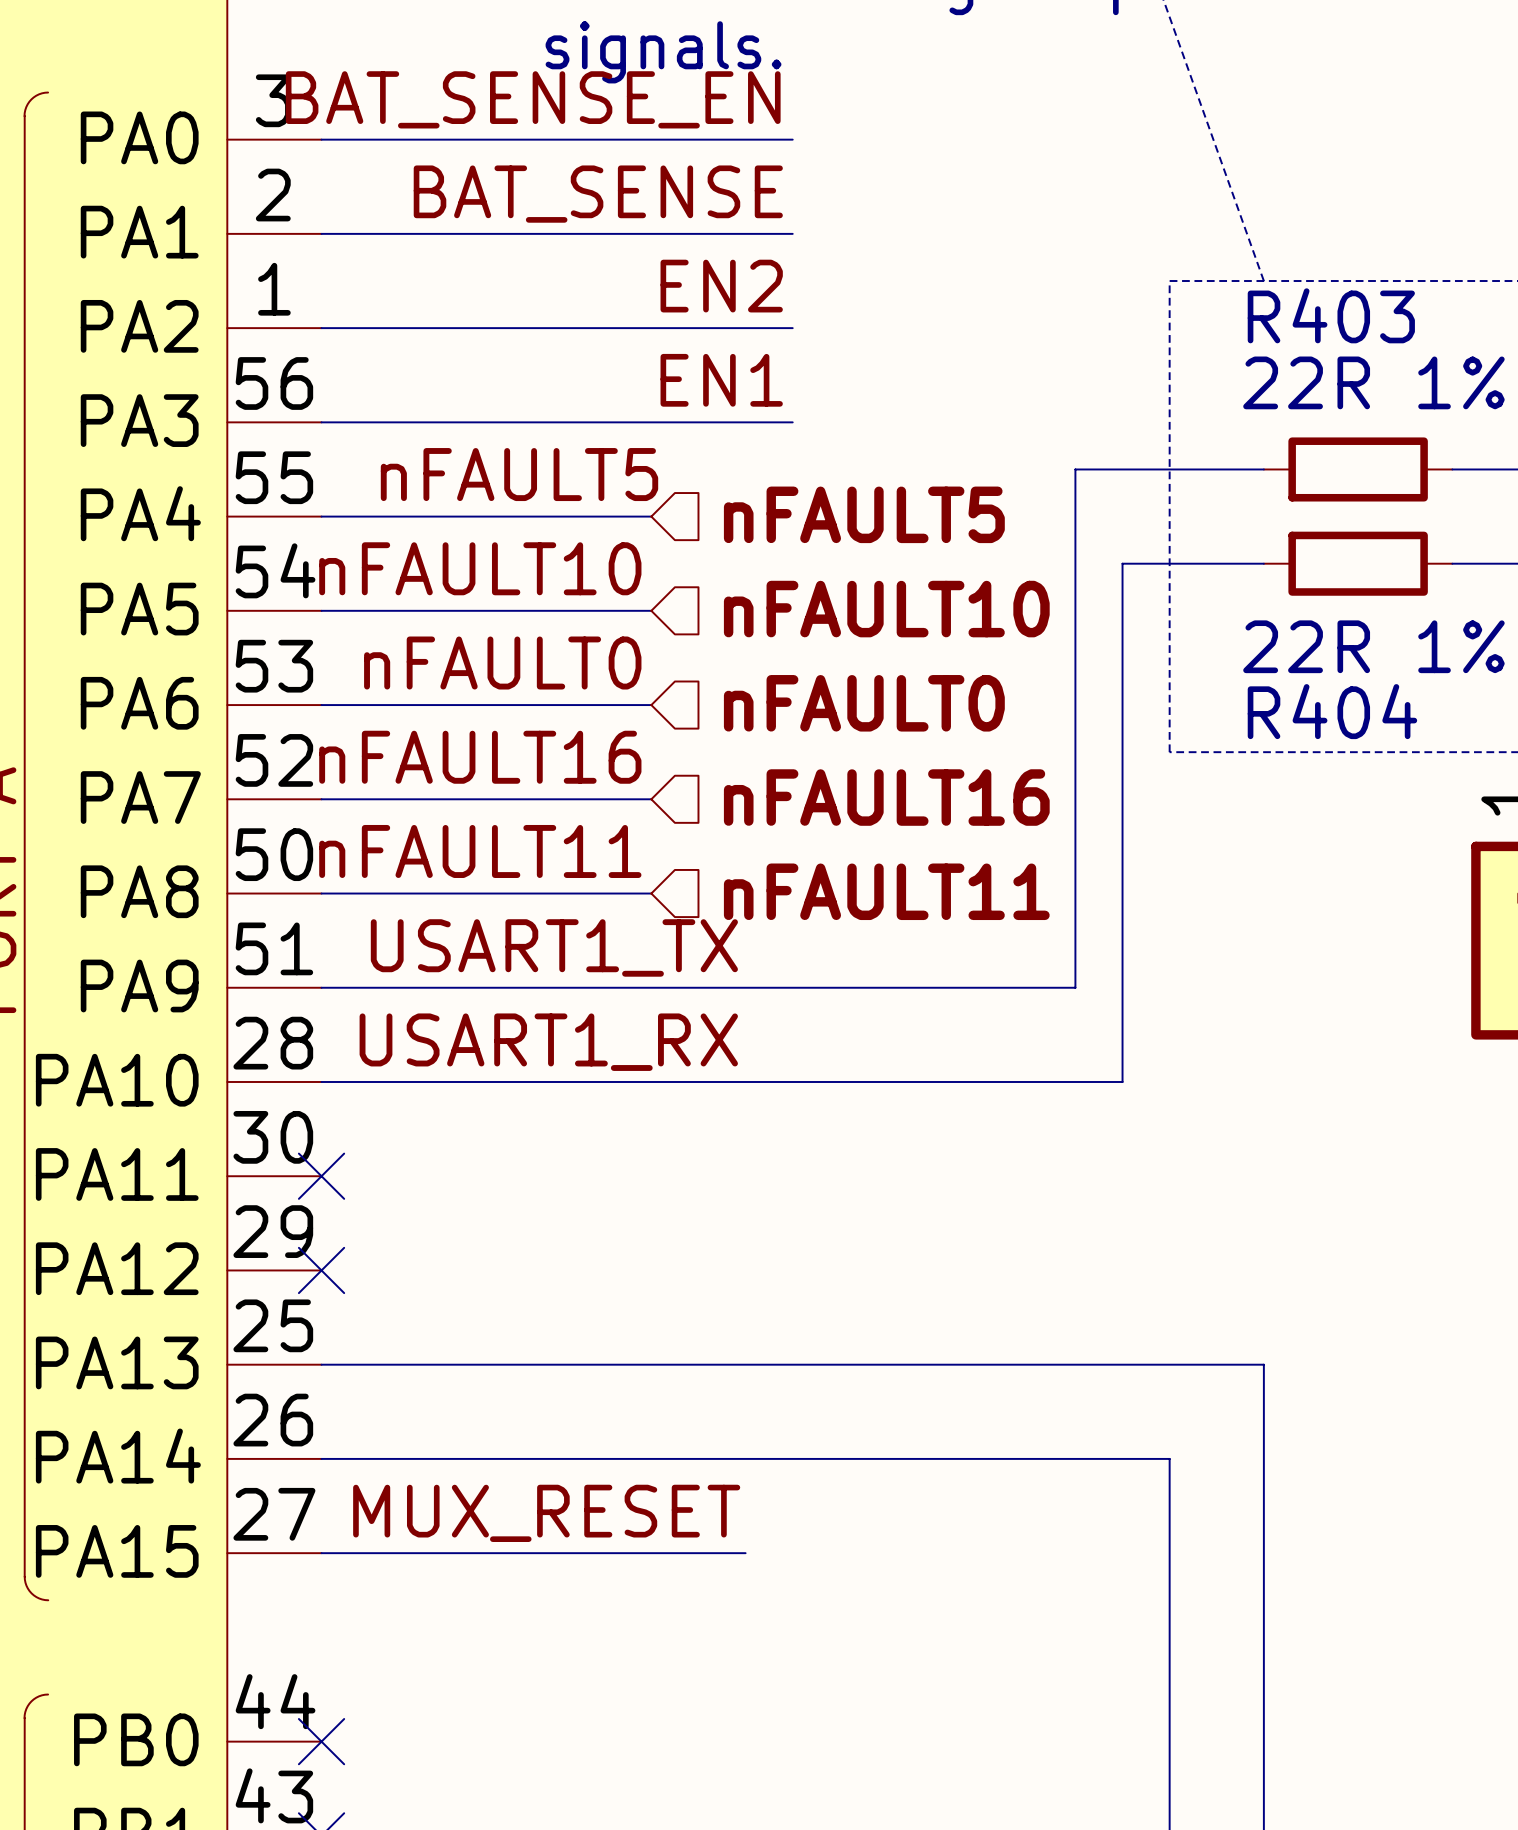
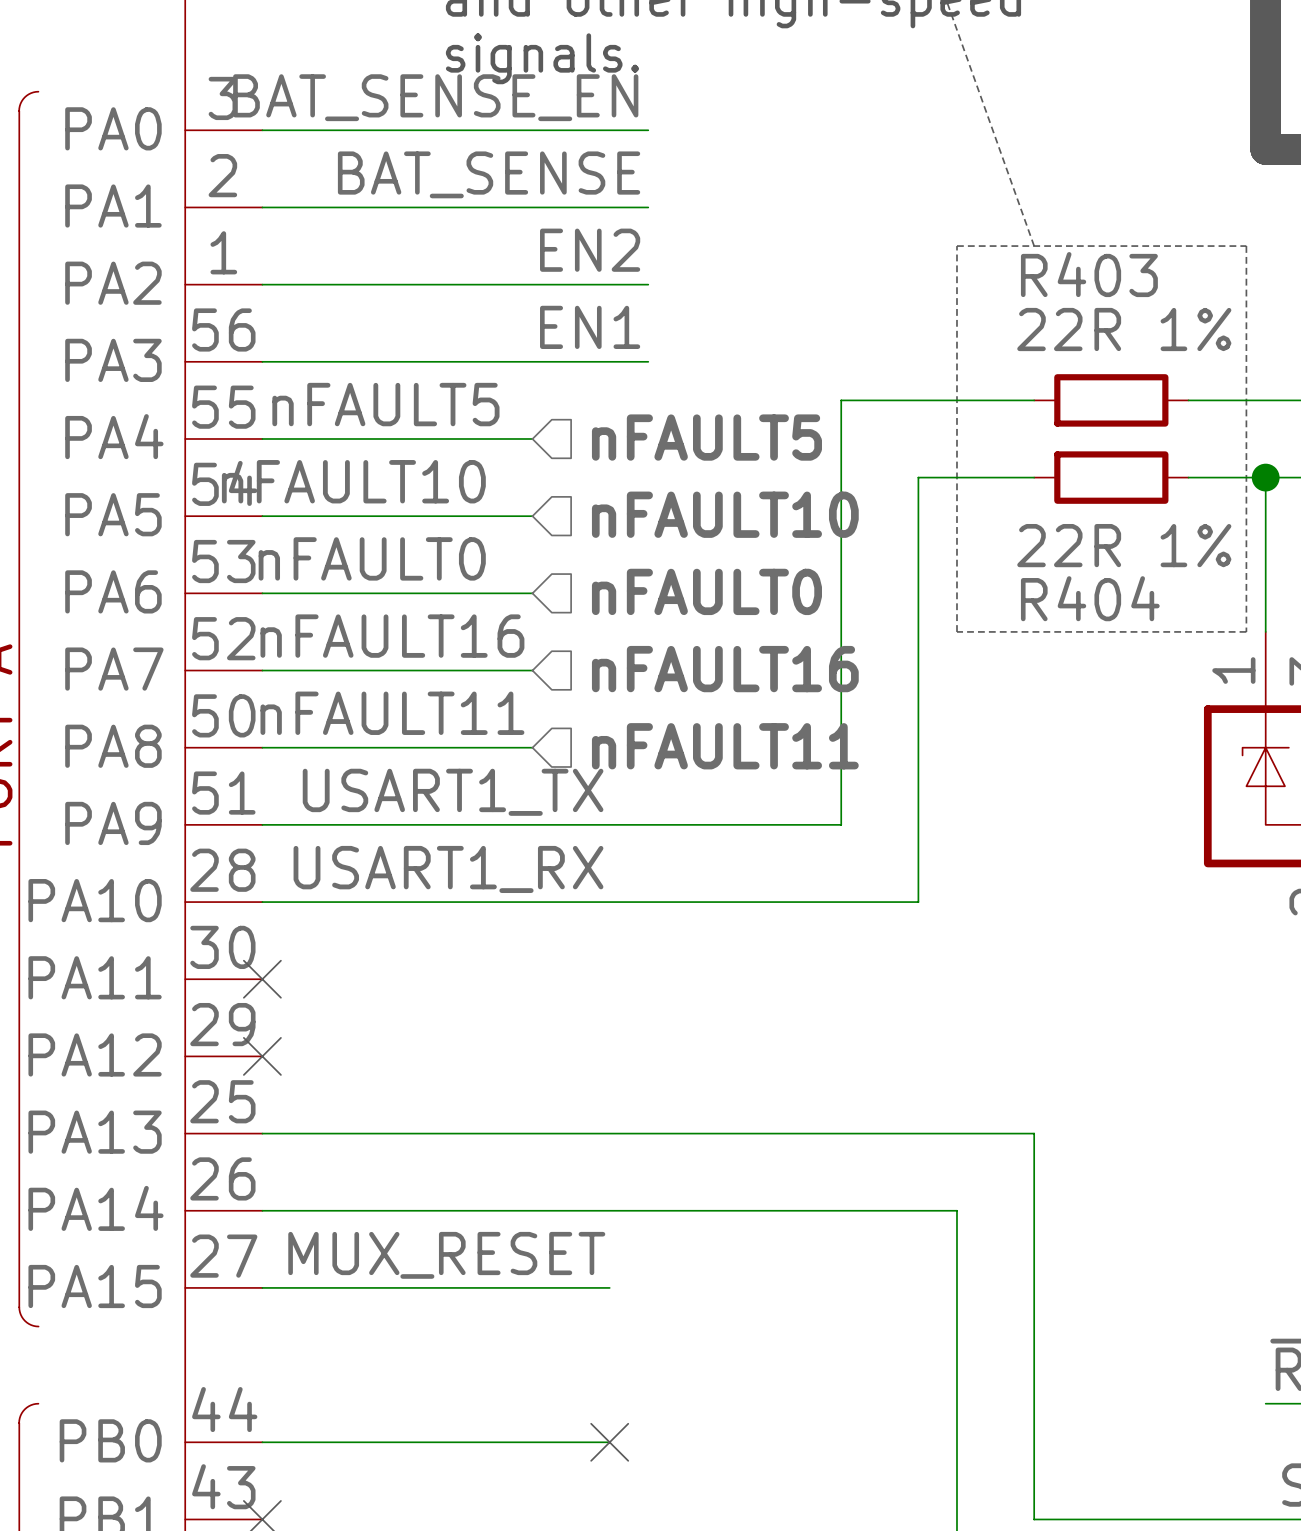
wire: (1075, 469) (1075, 987) (1028, 987) -> (879, 400) (841, 400) (841, 824)
label position: nFAULT5 (519, 474) -> nFAULT5 (385, 404)
label position: nFAULT10 (480, 568) -> nFAULT10 (353, 481)
label position: nFAULT0 (502, 663) -> nFAULT0 (372, 558)
wire: none -> (262, 1442) (609, 1442)
no-connect mark: (321, 1741) -> none
no-connect mark: none -> (609, 1442)

